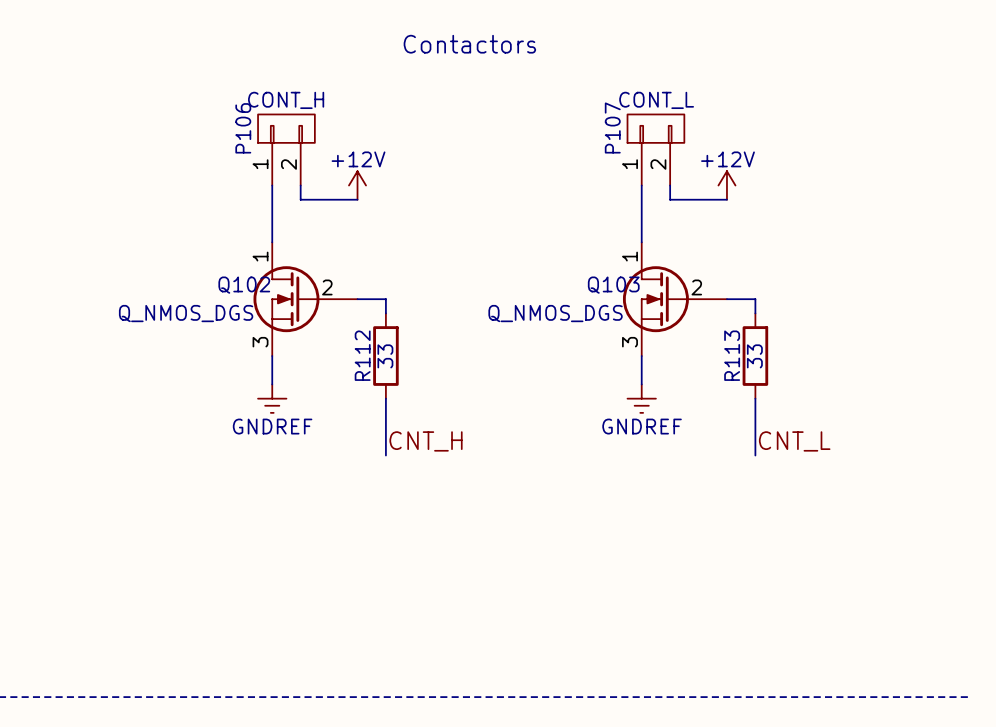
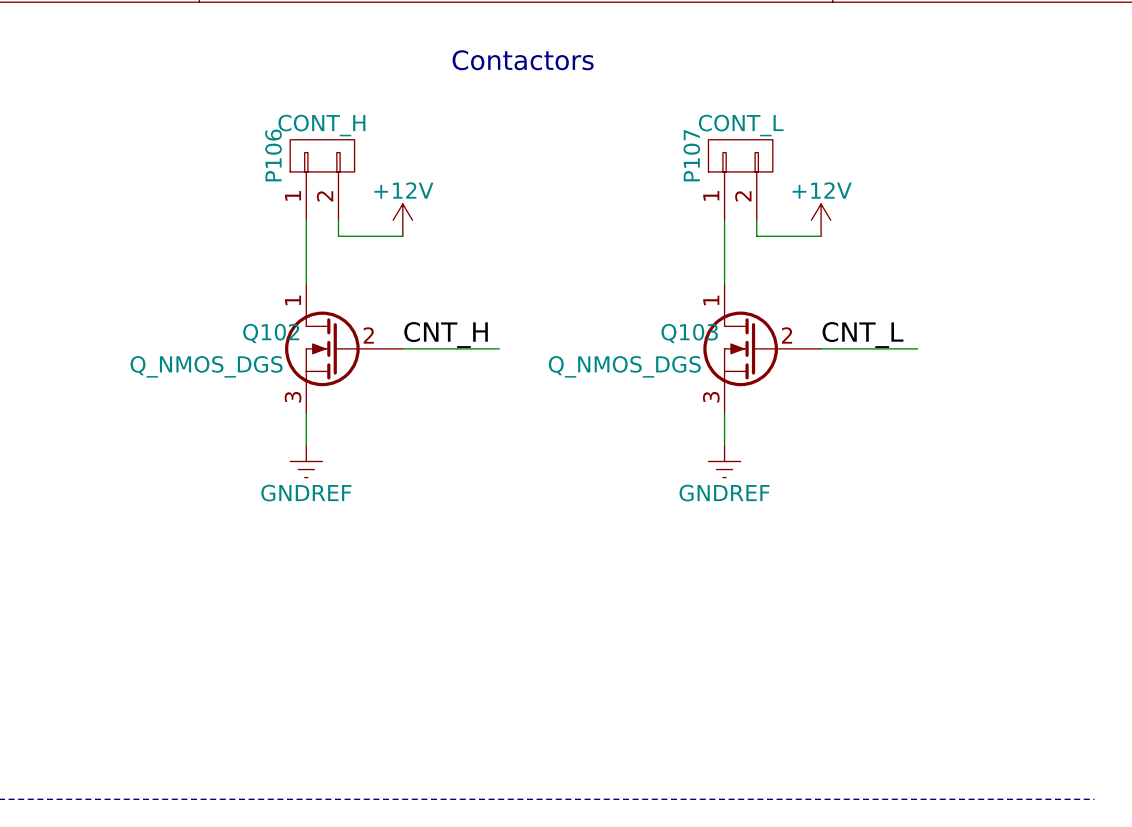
wire: (385, 299) (385, 313) -> (435, 348) (499, 348)
wire: (755, 299) (755, 313) -> (853, 348) (917, 348)
R112: 33 (385, 356) -> none
R113: 33 (755, 356) -> none
wire: (385, 398) (385, 455) -> none
wire: (755, 398) (755, 455) -> none
label position: CNT_H (426, 441) -> CNT_H (446, 334)
label position: CNT_L (794, 441) -> CNT_L (862, 334)

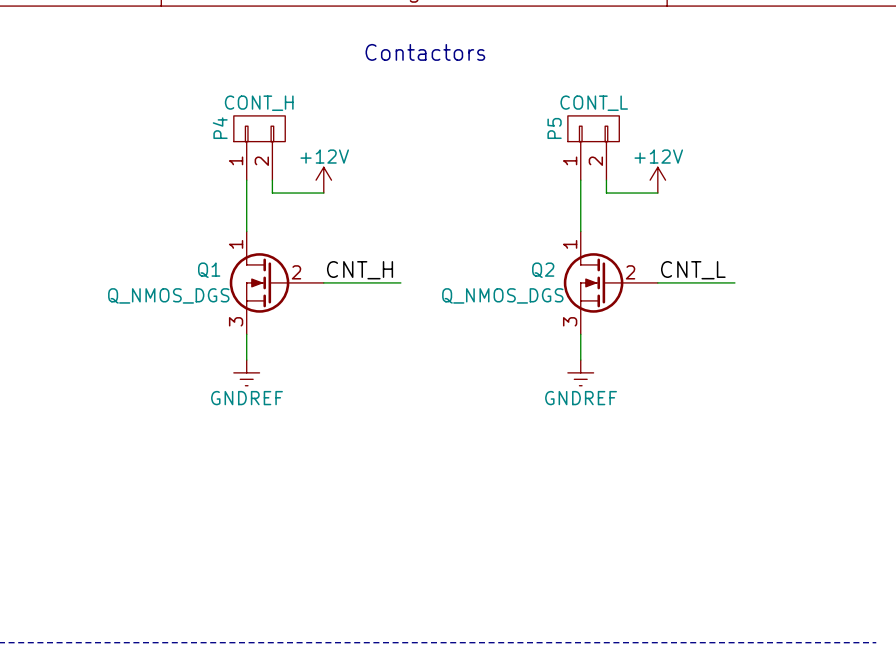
P106 name: P106 (273, 155) -> P4 (220, 128)
P107 name: P107 (691, 155) -> P5 (554, 128)
Q102 name: Q102 (271, 333) -> Q1 (209, 270)
Q103 name: Q103 (689, 333) -> Q2 (543, 270)

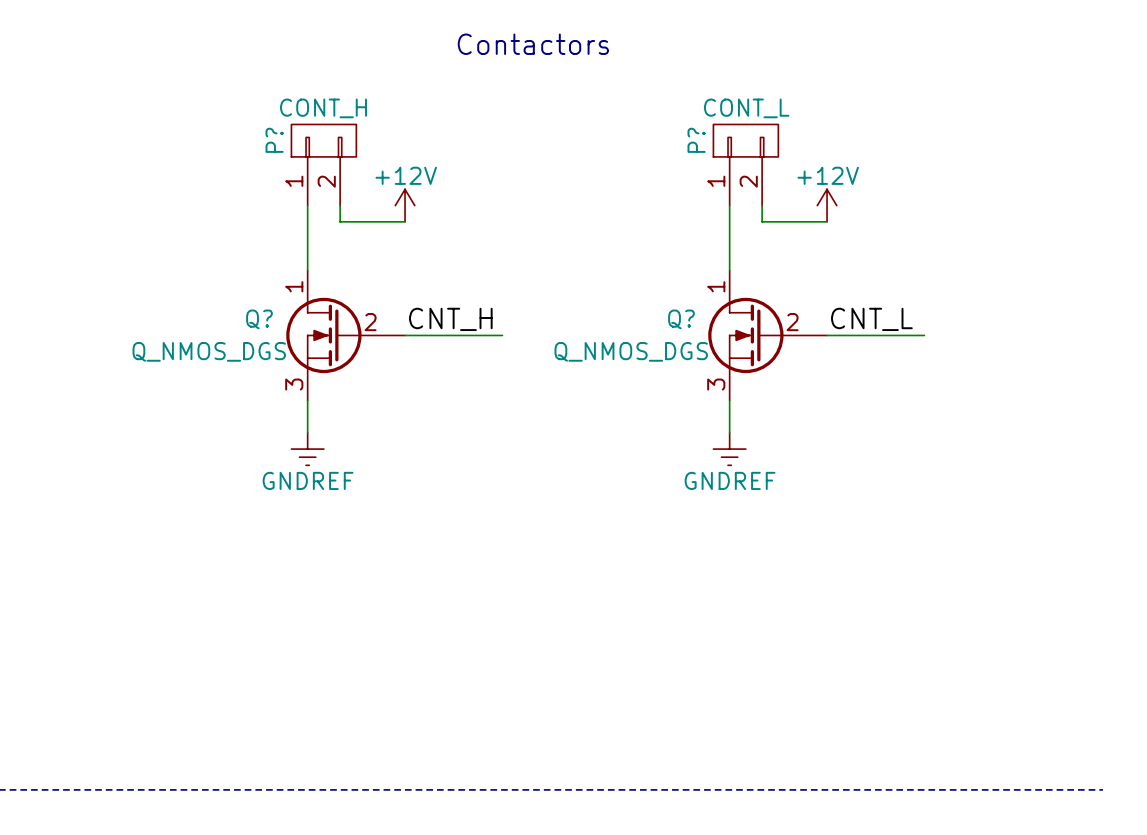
P4 name: P4 (220, 128) -> P? (274, 140)
P5 name: P5 (554, 128) -> P? (696, 140)
Q1 name: Q1 (209, 270) -> Q? (259, 319)
Q2 name: Q2 (543, 270) -> Q? (681, 319)

